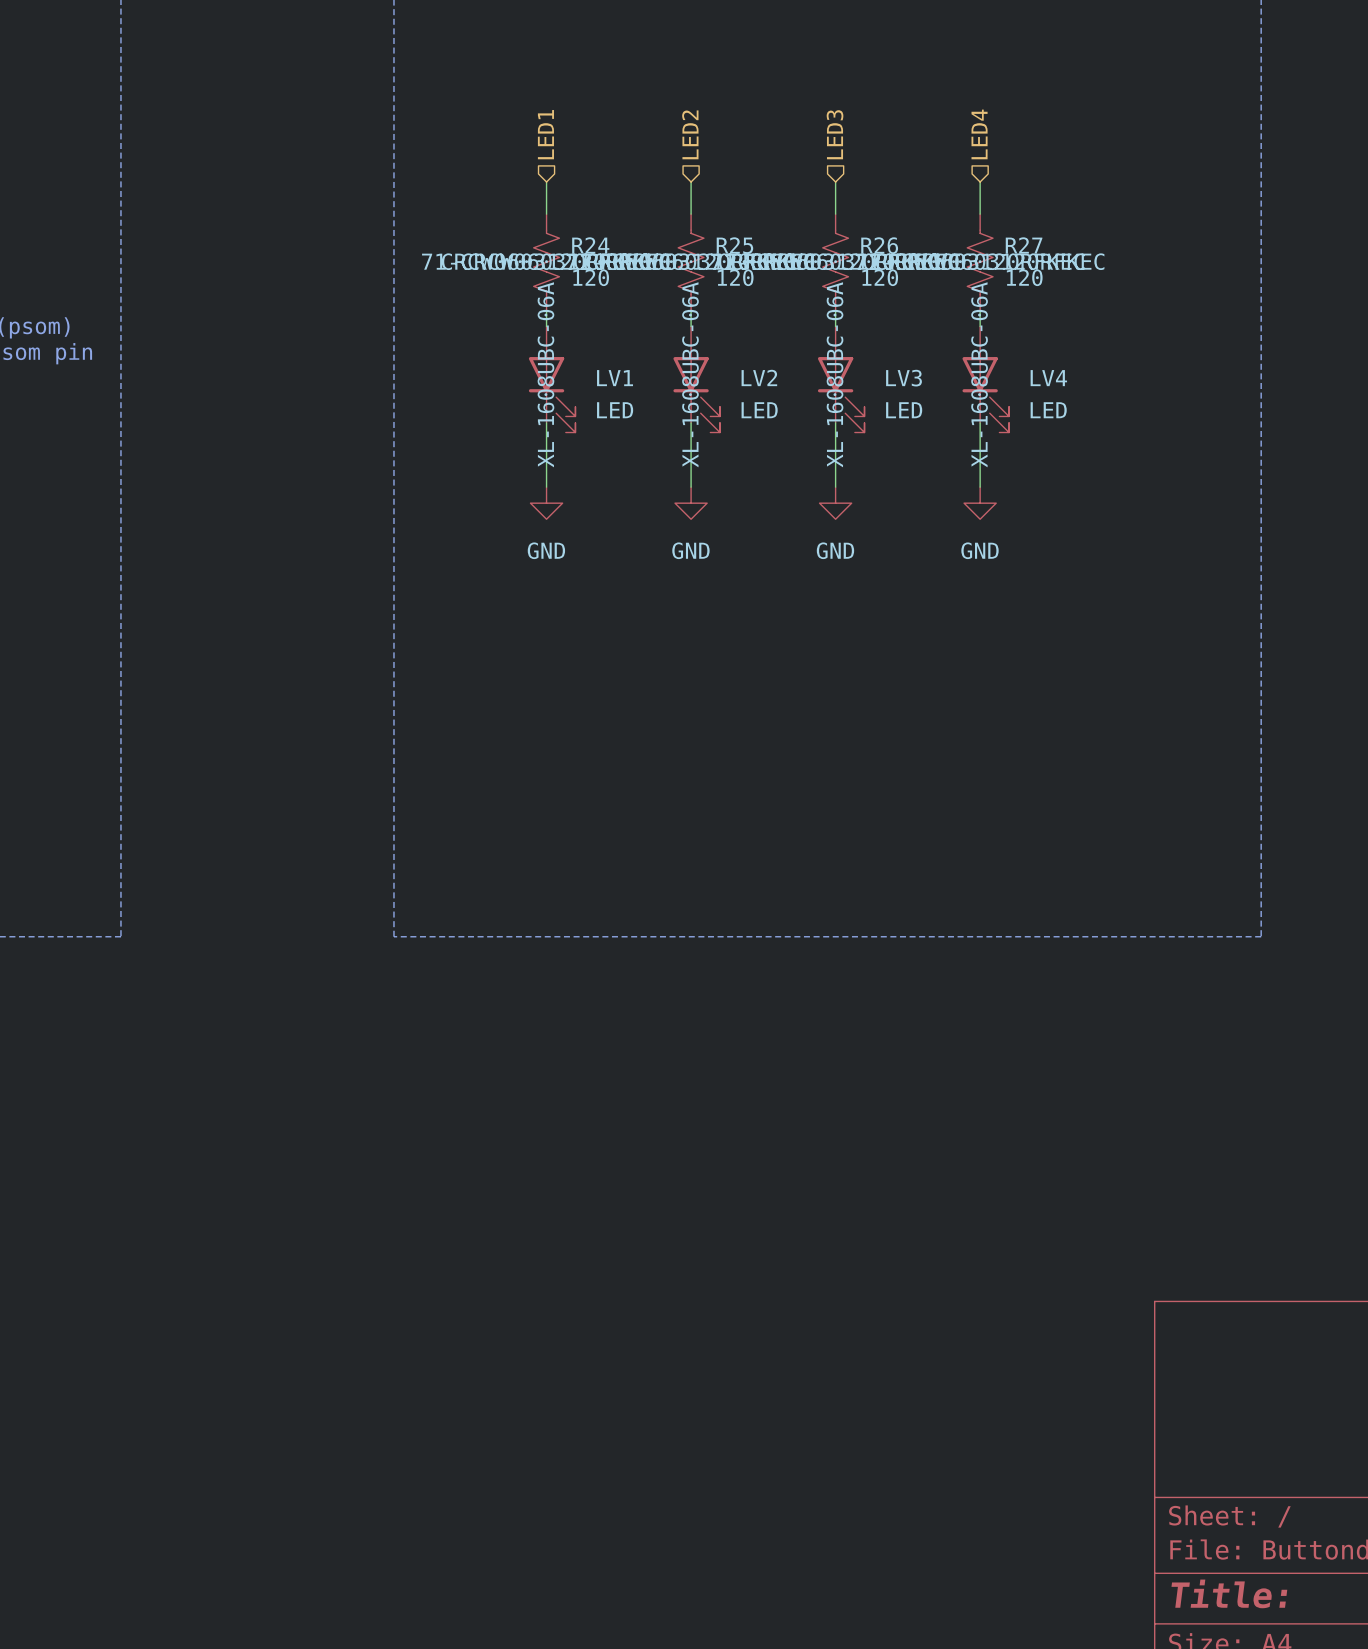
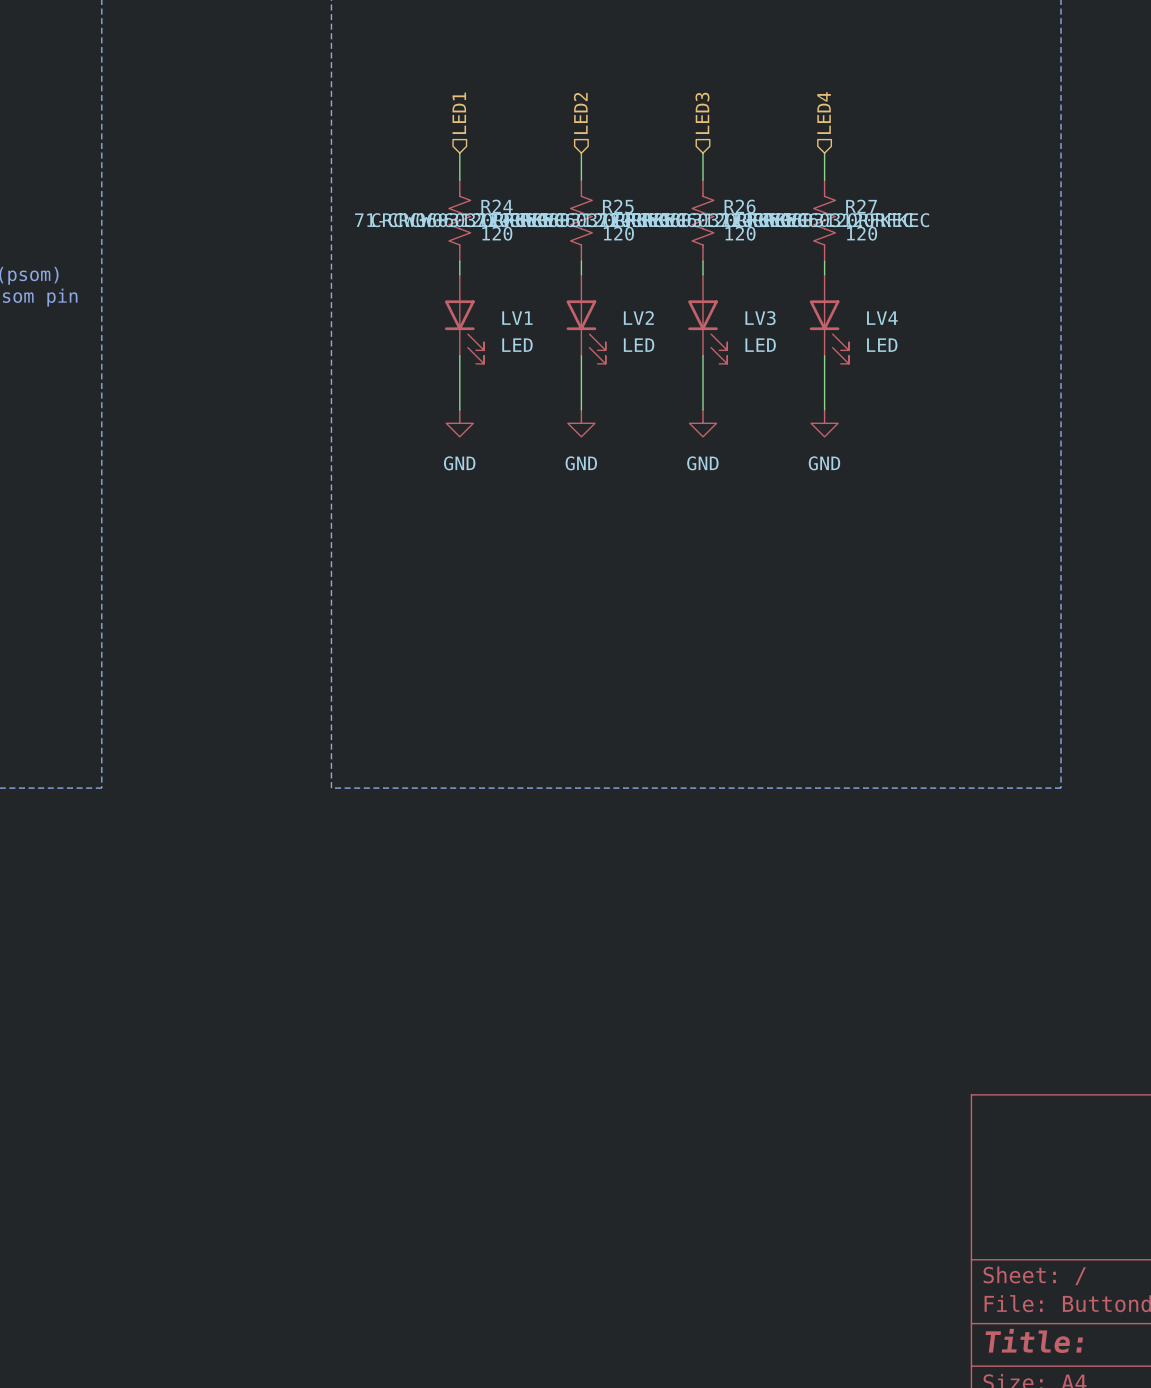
LV1 text: XL-1608UBC-06A (545, 374) -> none
LV2 text: XL-1608UBC-06A (690, 374) -> none
LV3 text: XL-1608UBC-06A (835, 374) -> none
LV4 text: XL-1608UBC-06A (979, 374) -> none

